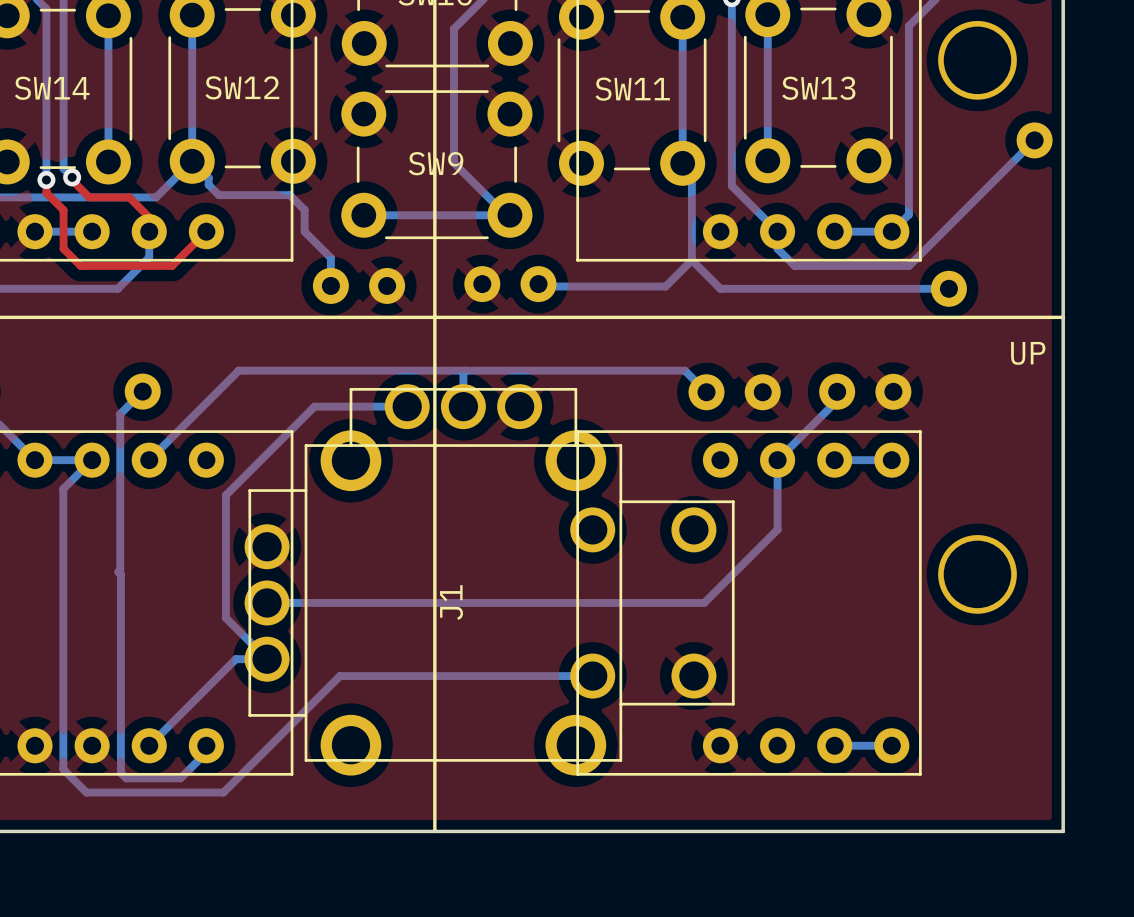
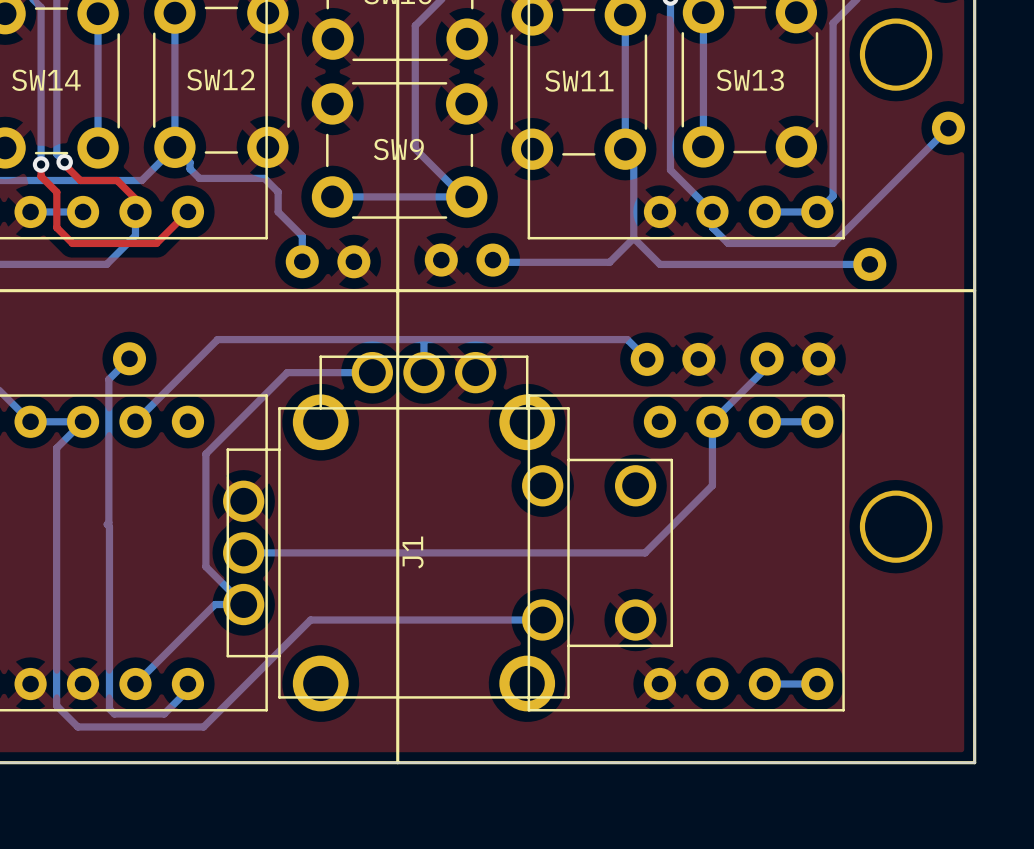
text: UP (1028, 353) -> none

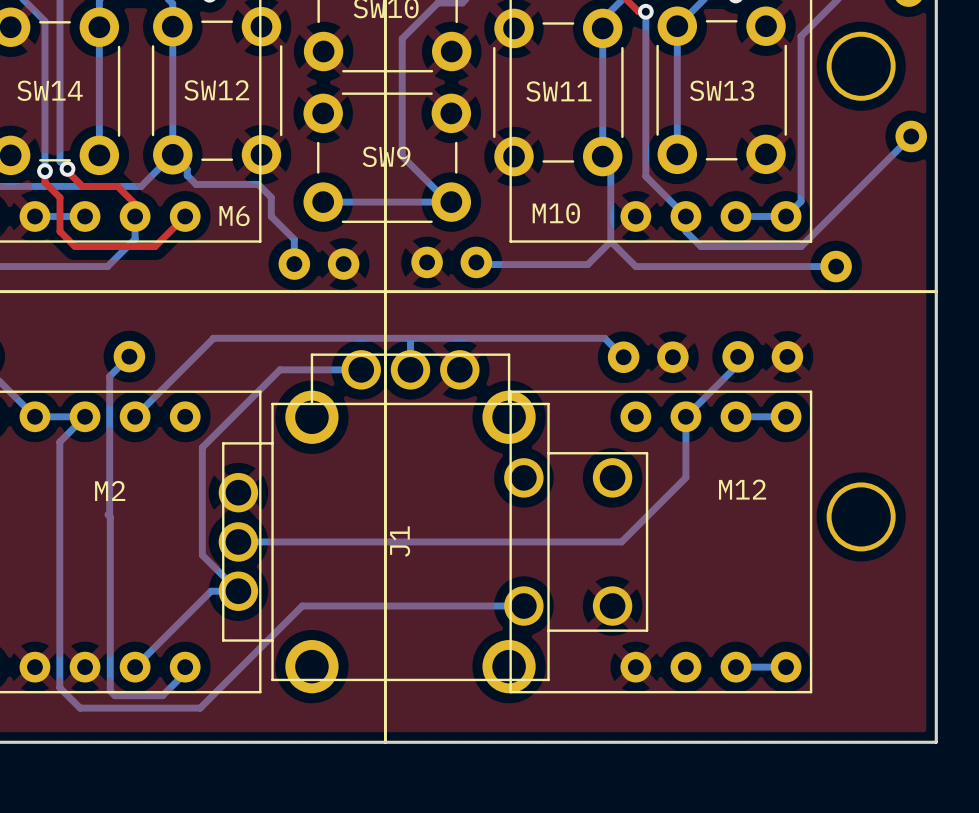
M10 name: none -> M10 (556, 213)
M6 name: none -> M6 (234, 216)
M12 name: none -> M12 (742, 489)
M2 name: none -> M2 (110, 490)

